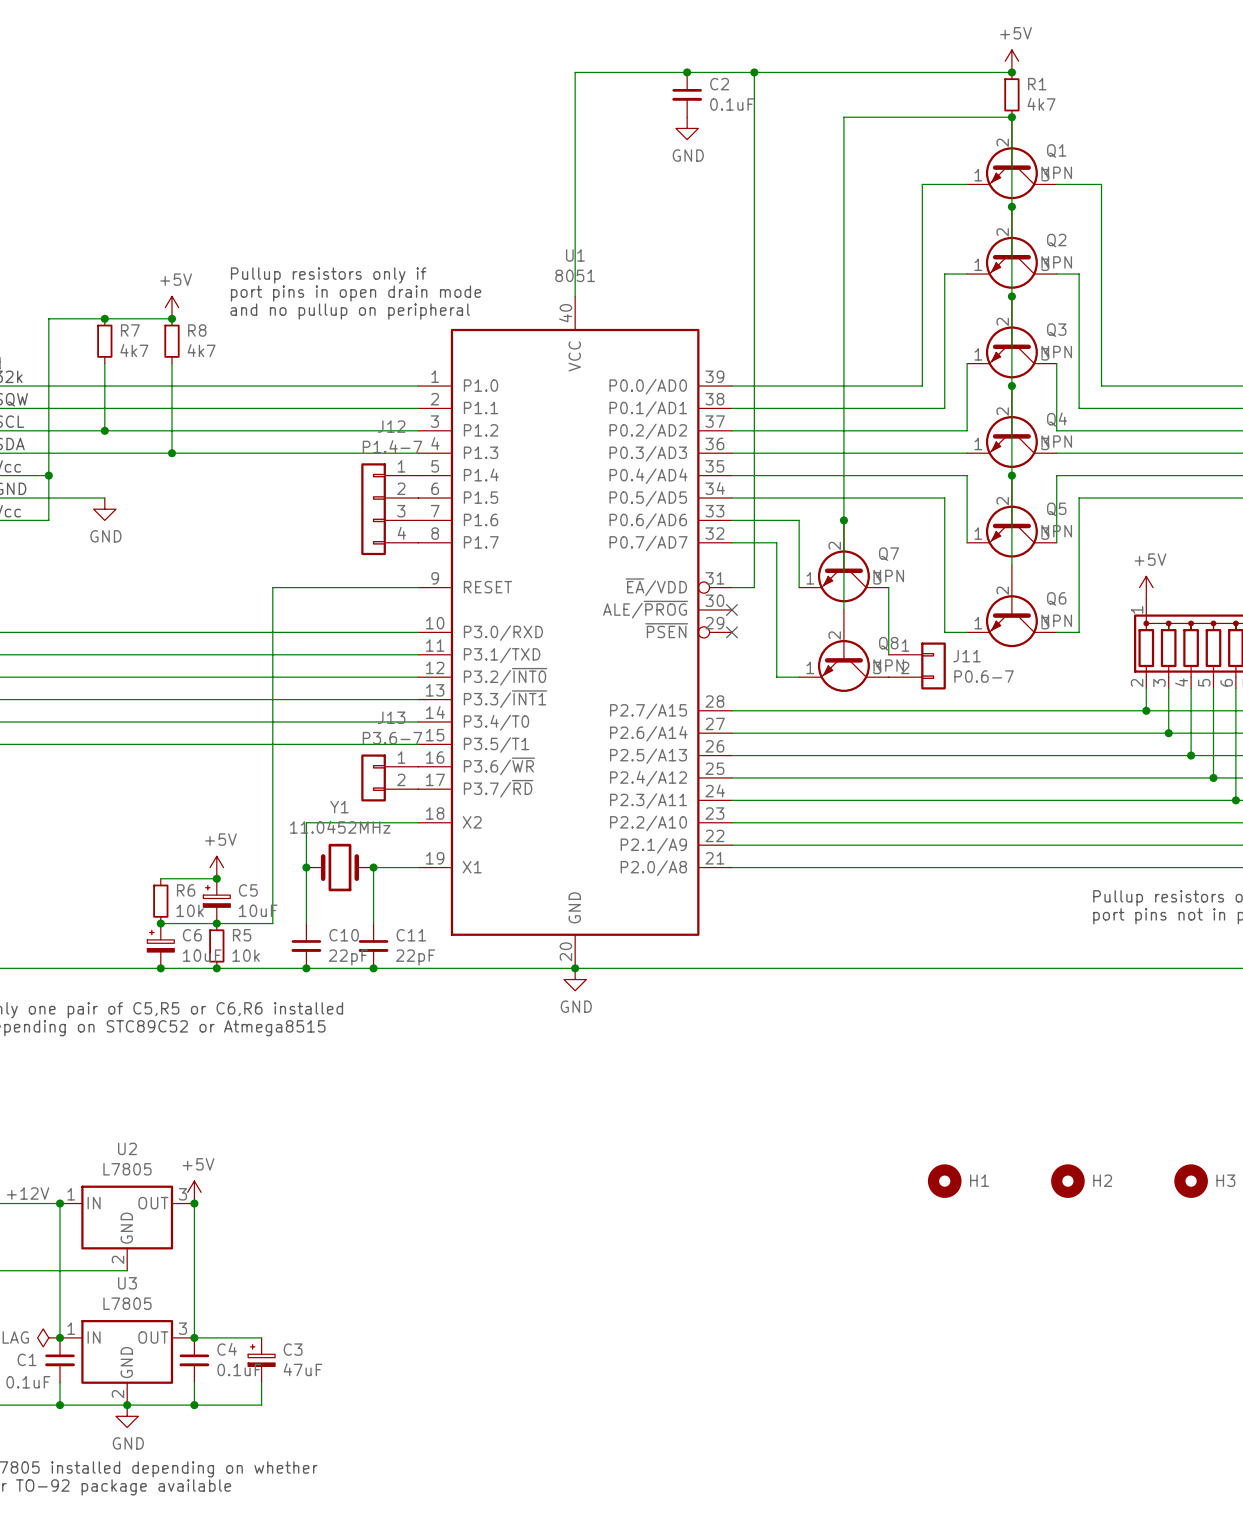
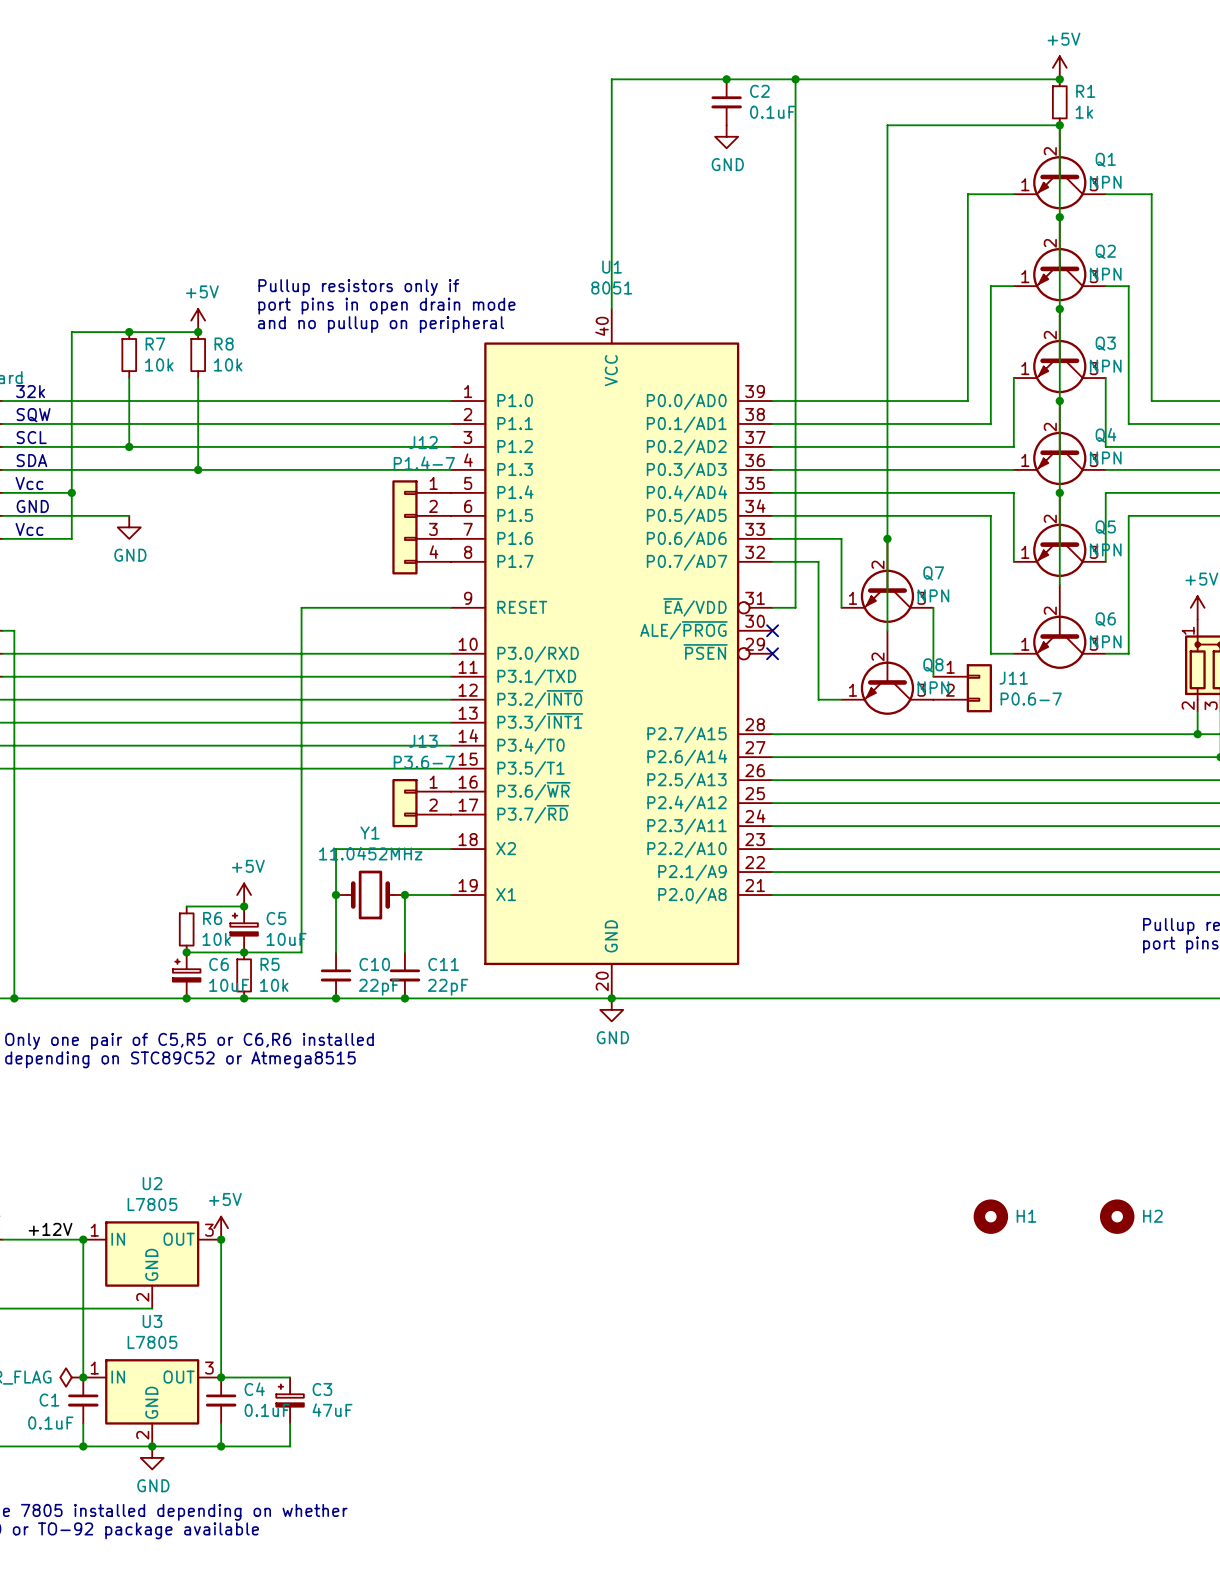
R1 value: 4k7 (1041, 104) -> 1k (1084, 112)
R7 value: 4k7 (134, 350) -> 10k (159, 364)
R8 value: 4k7 (201, 350) -> 10k (228, 364)

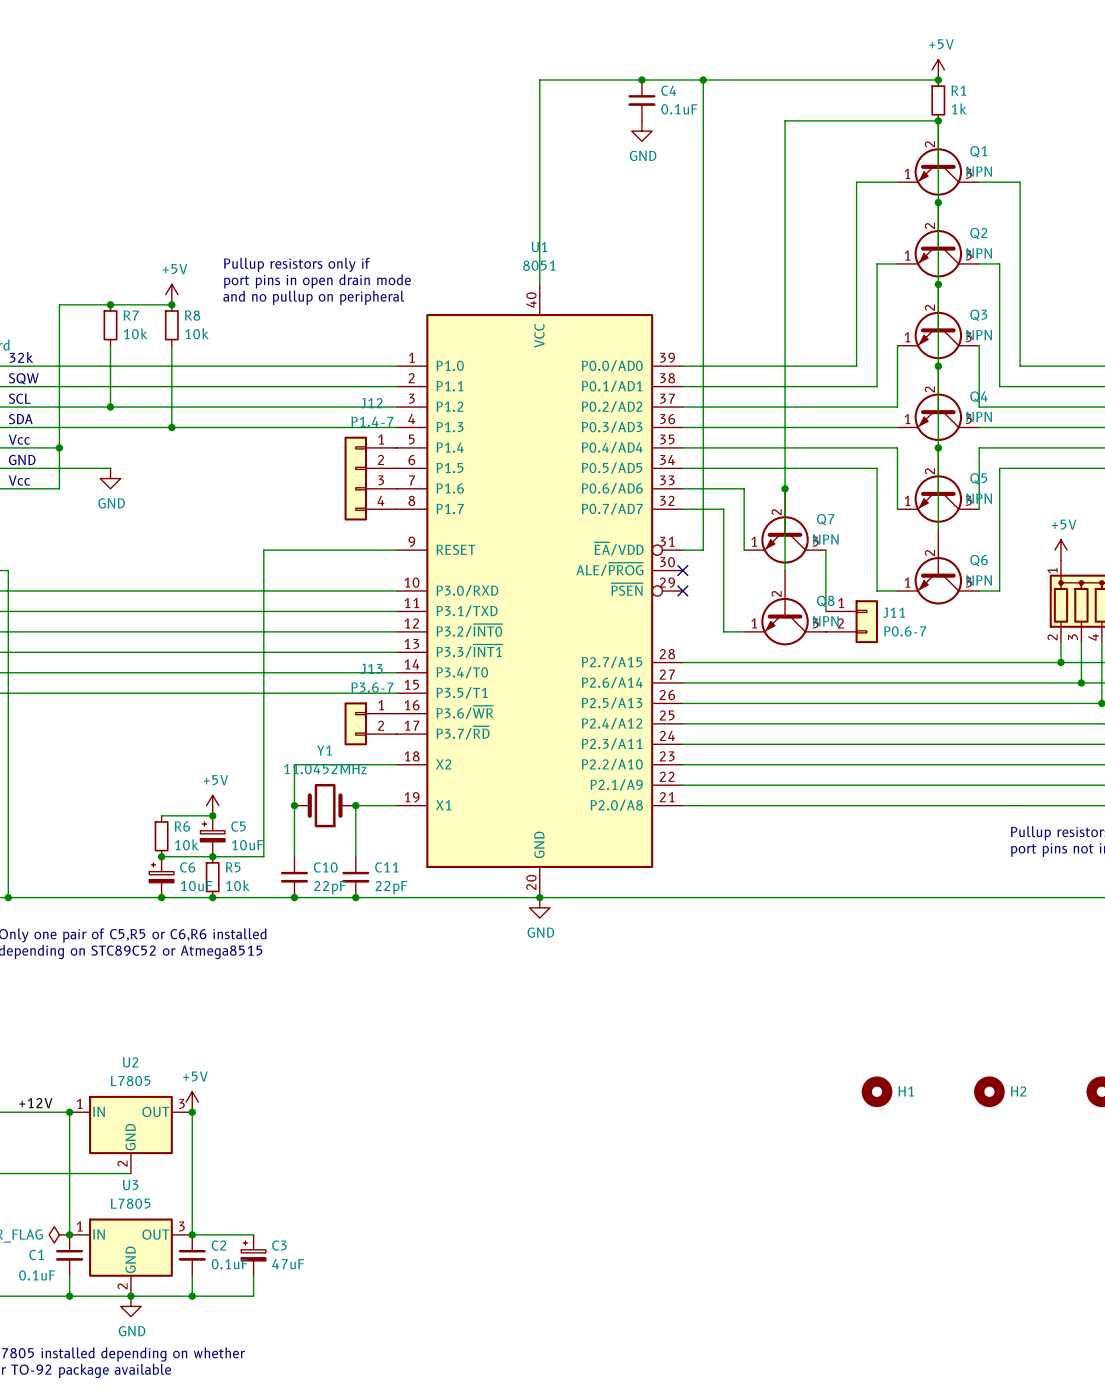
C2 name: C2 (759, 91) -> C4 (668, 90)
C4 name: C4 (254, 1389) -> C2 (218, 1245)

